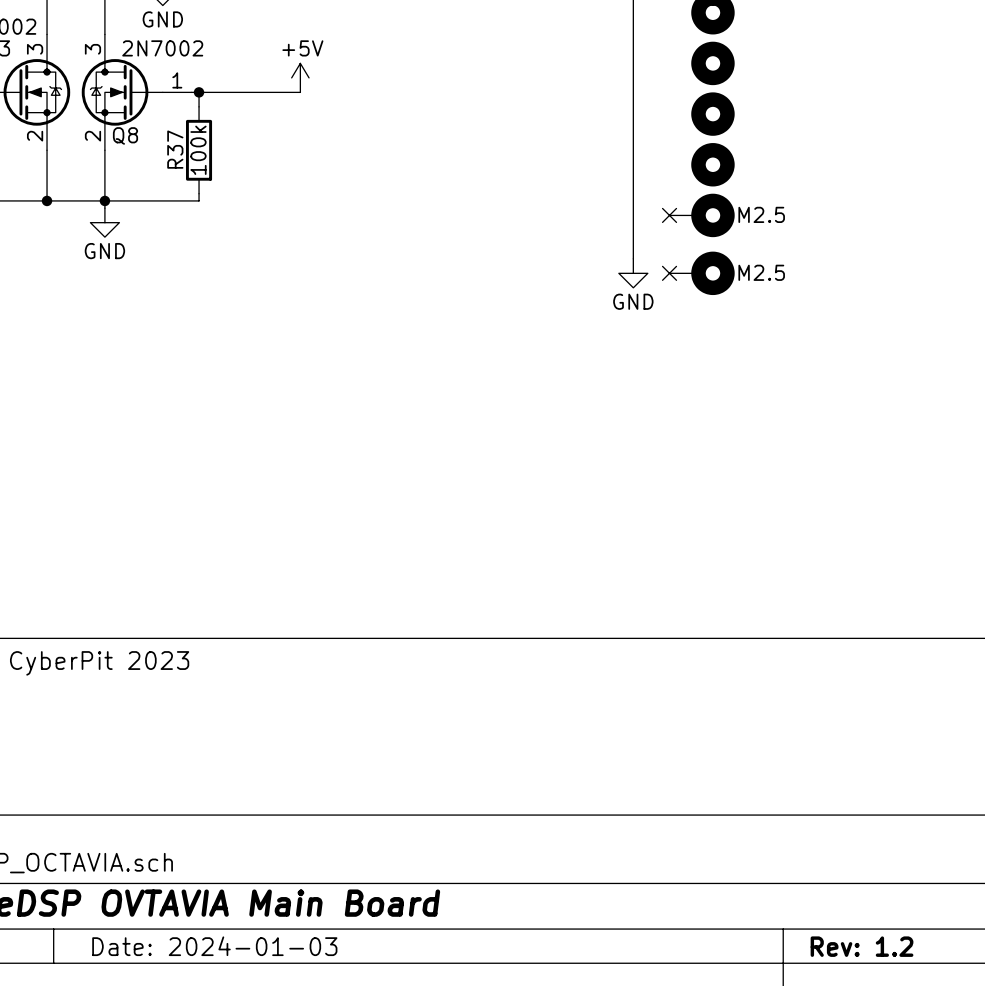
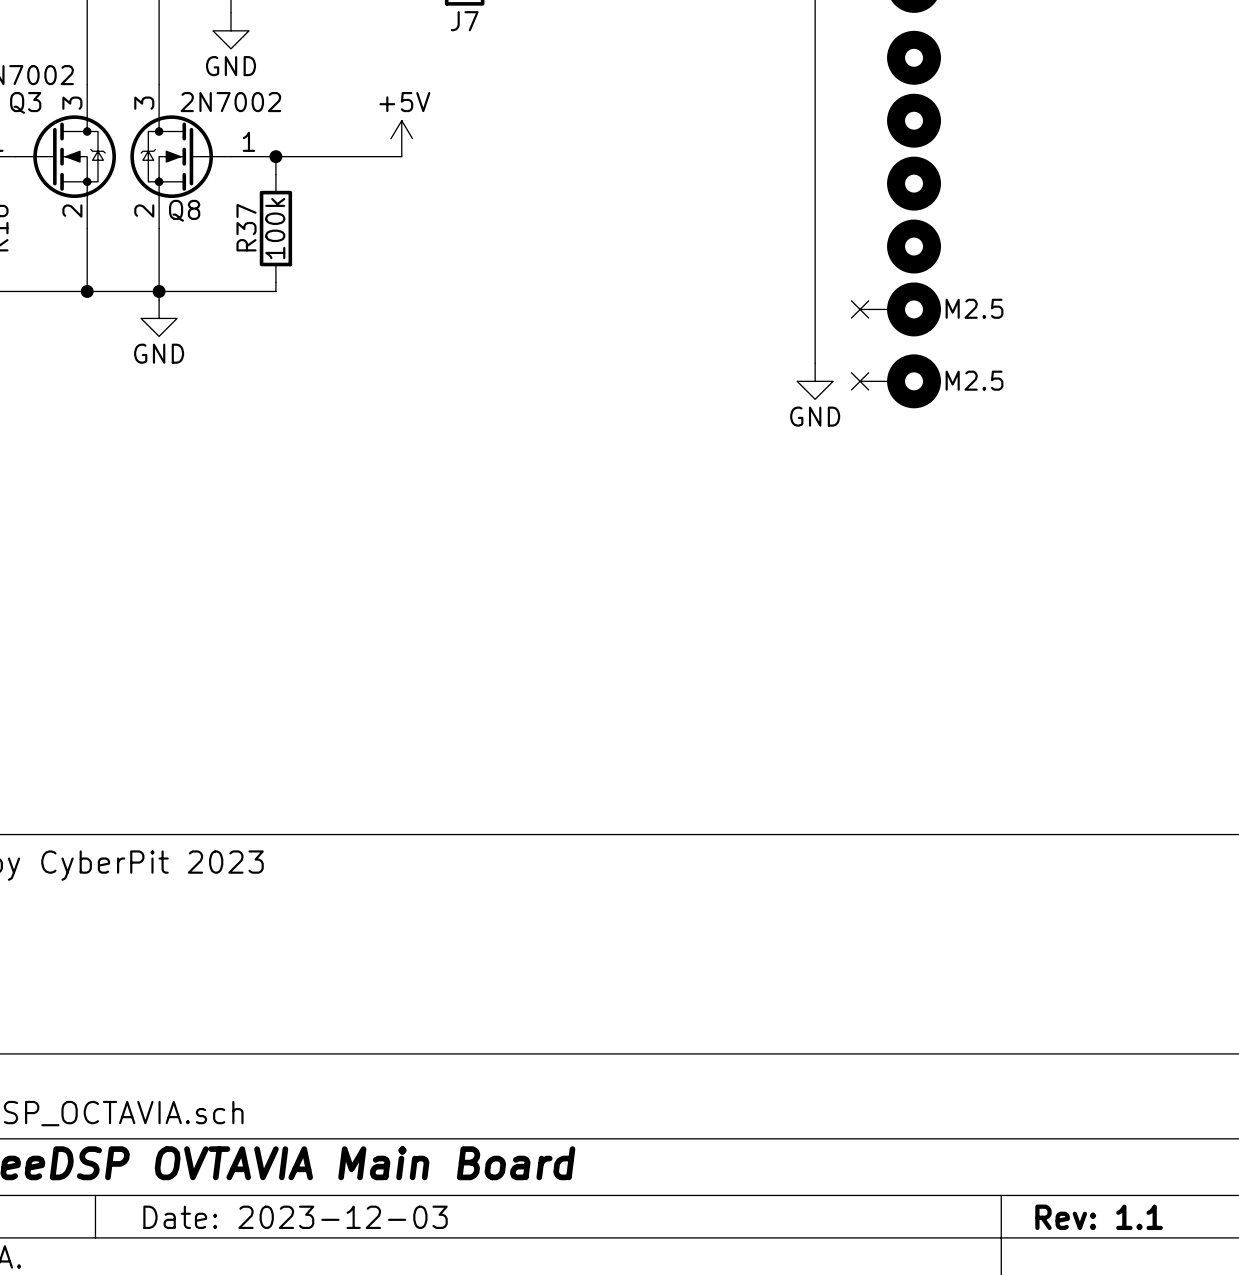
title block: Date: 2024-01-03 (214, 946) -> Date: 2023-12-03 (295, 1217)
title block: Rev: 1.2 (862, 946) -> Rev: 1.1 (1099, 1217)

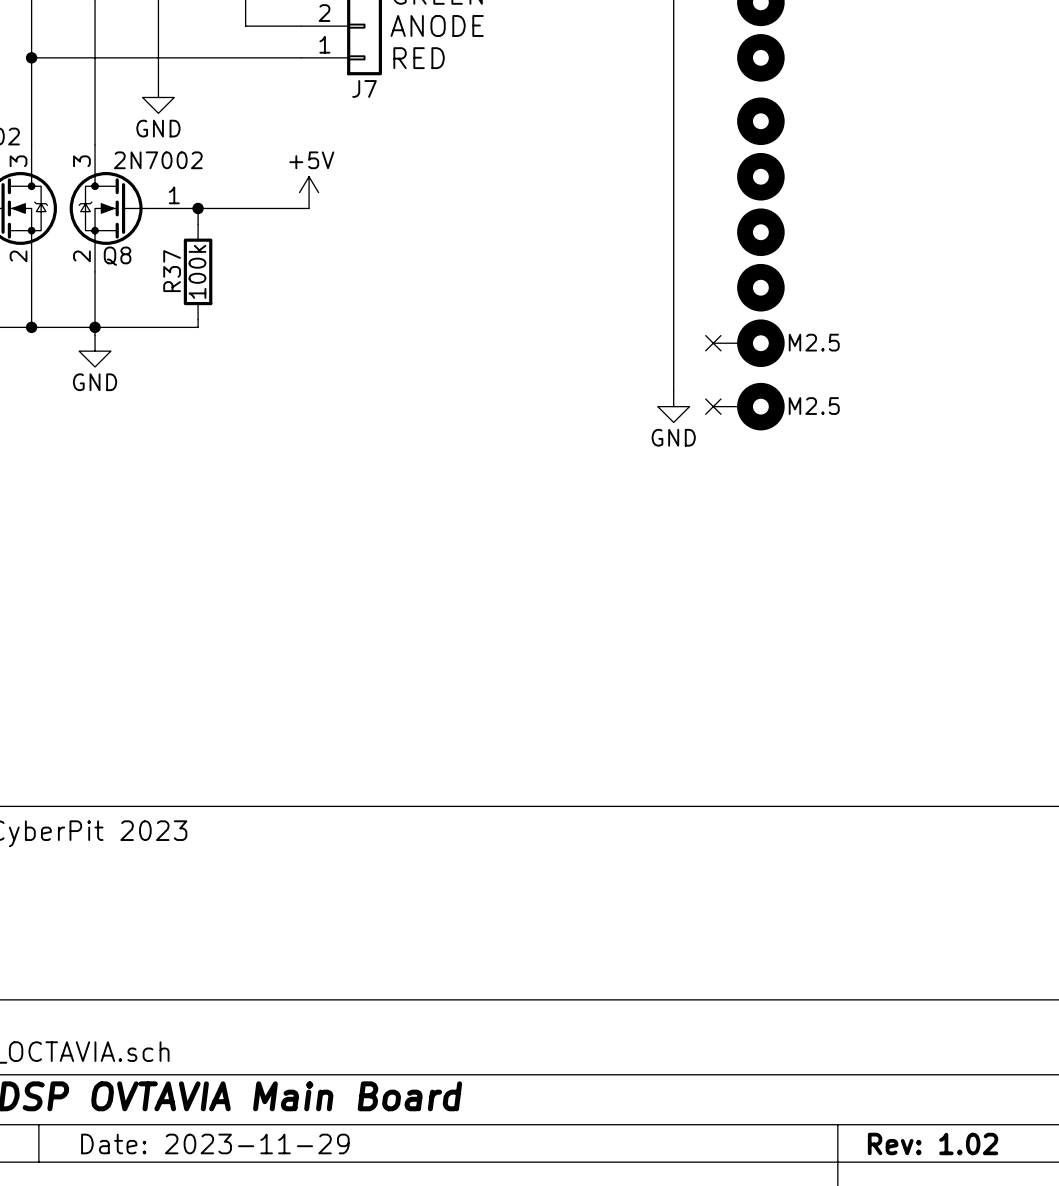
title block: Date: 2023-12-03 (295, 1217) -> Date: 2023-11-29 (215, 1143)
title block: Rev: 1.1 (1099, 1217) -> Rev: 1.02 (933, 1143)

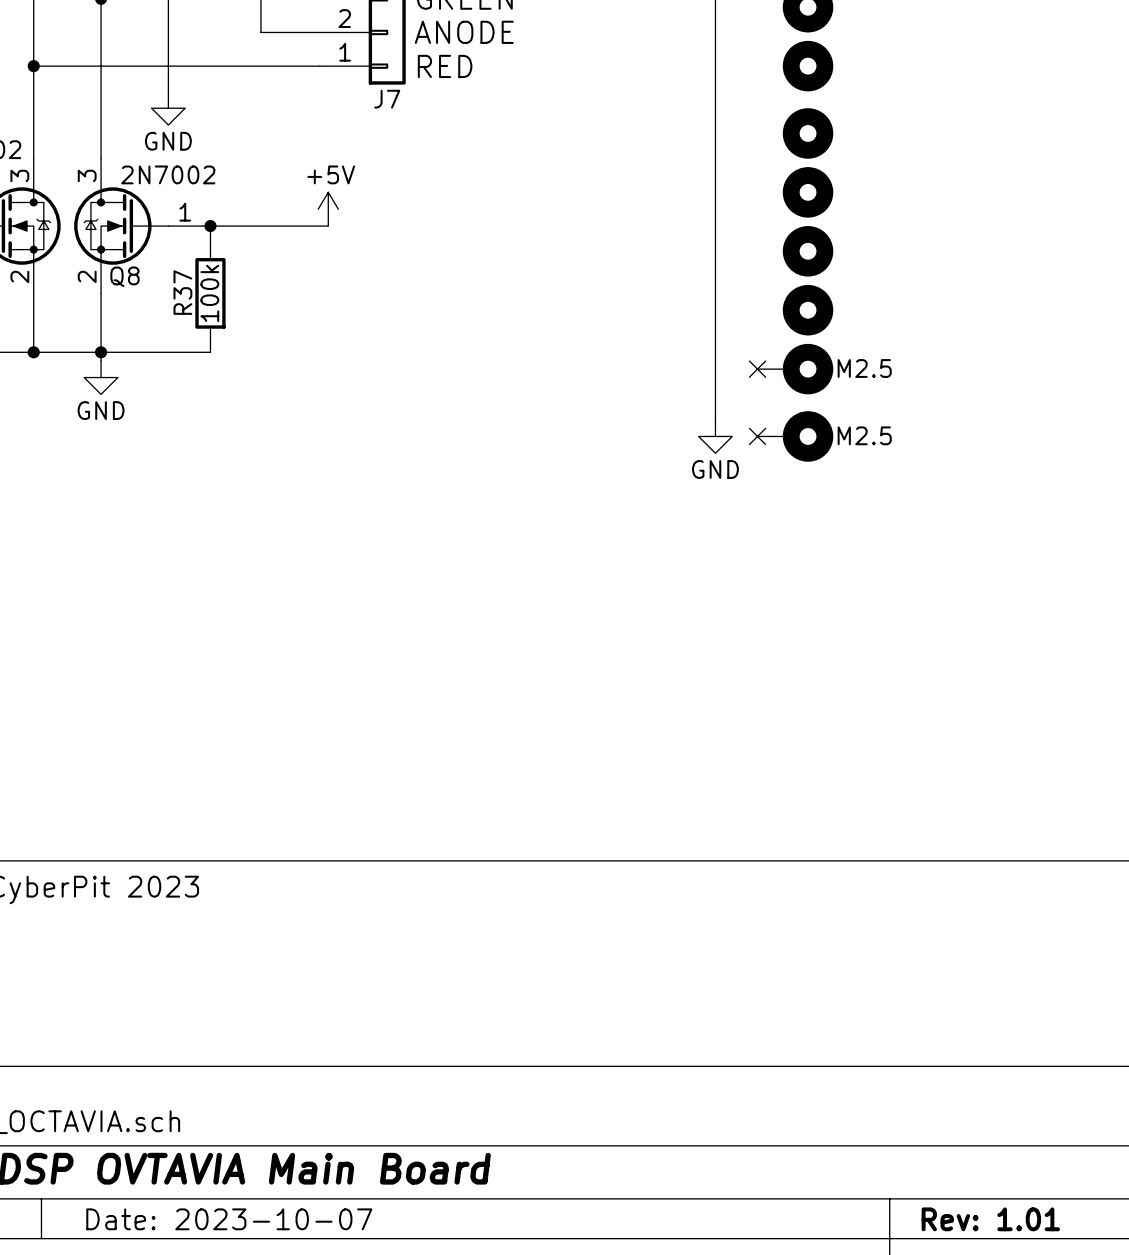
title block: Date: 2023-11-29 (215, 1143) -> Date: 2023-10-07 (229, 1219)
title block: Rev: 1.02 (933, 1143) -> Rev: 1.01 (990, 1219)

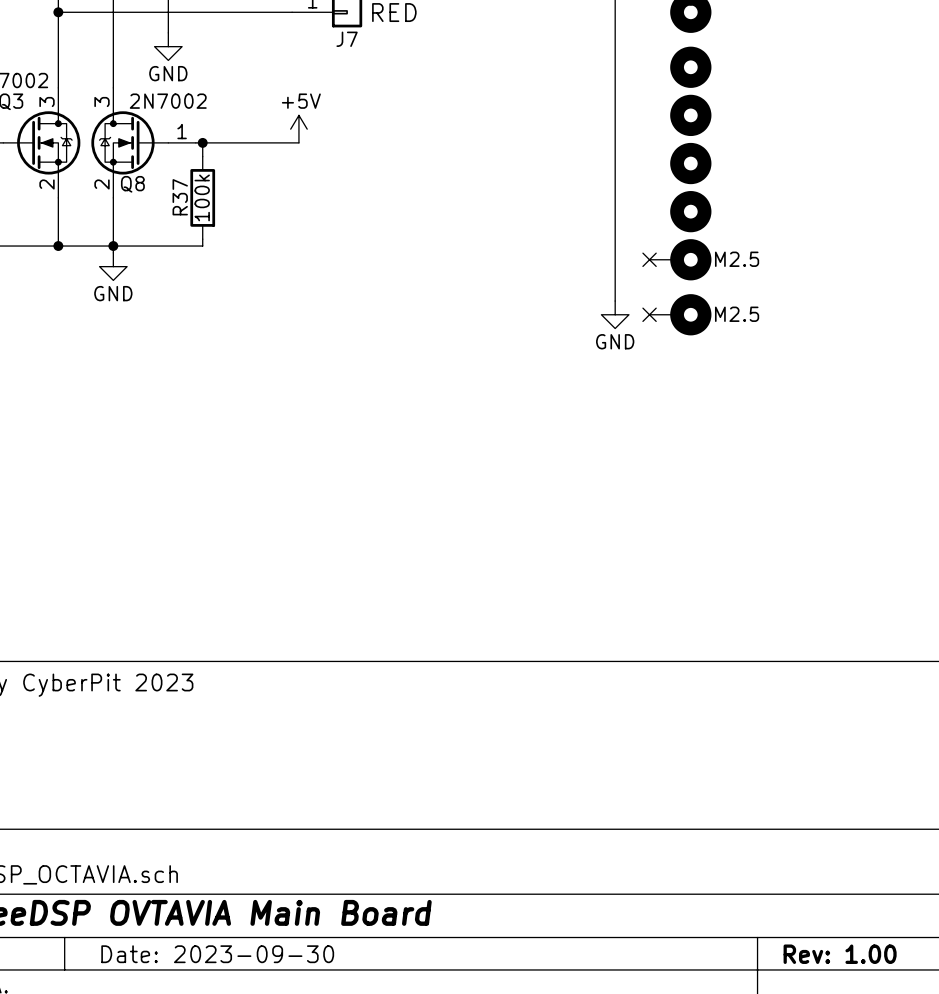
title block: Date: 2023-10-07 (229, 1219) -> Date: 2023-09-30 (217, 954)
title block: Rev: 1.01 (990, 1219) -> Rev: 1.00 (840, 954)

